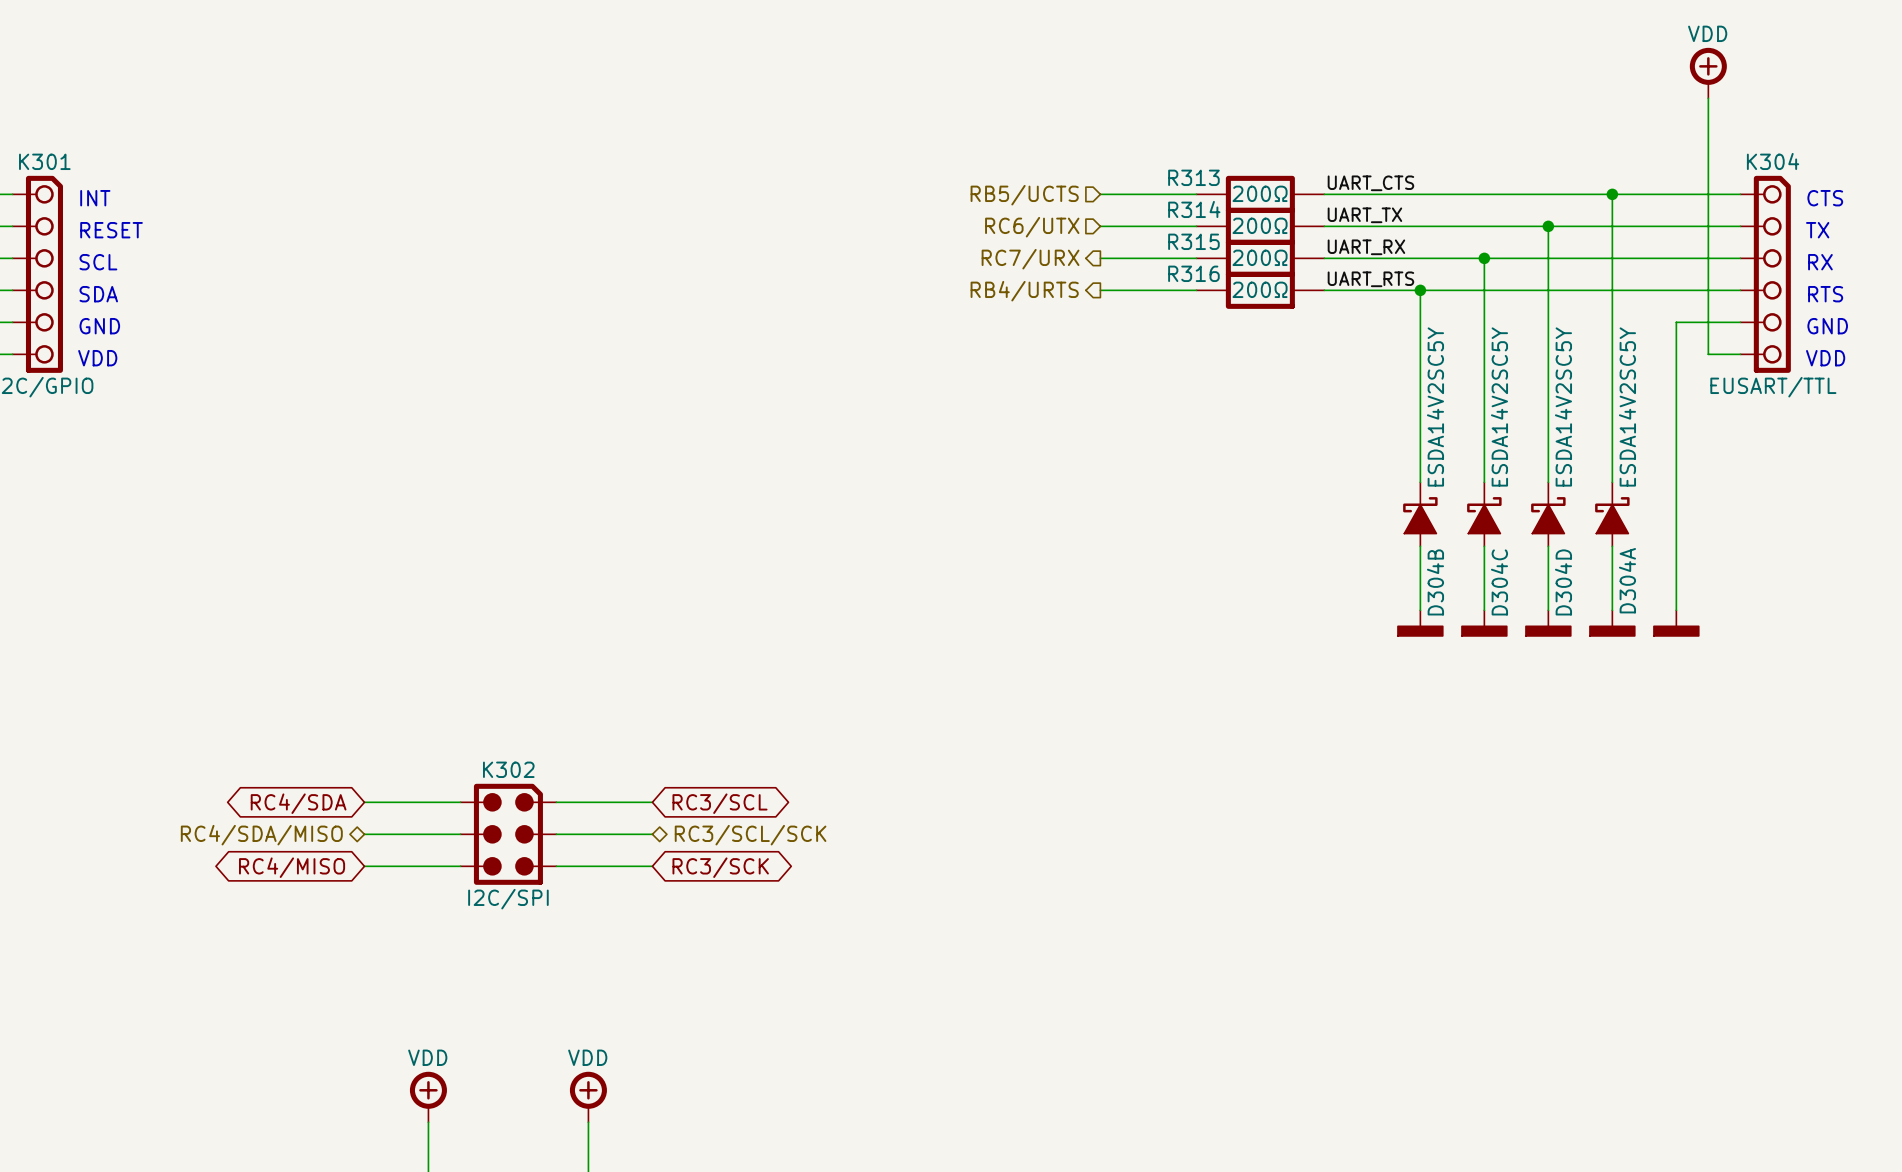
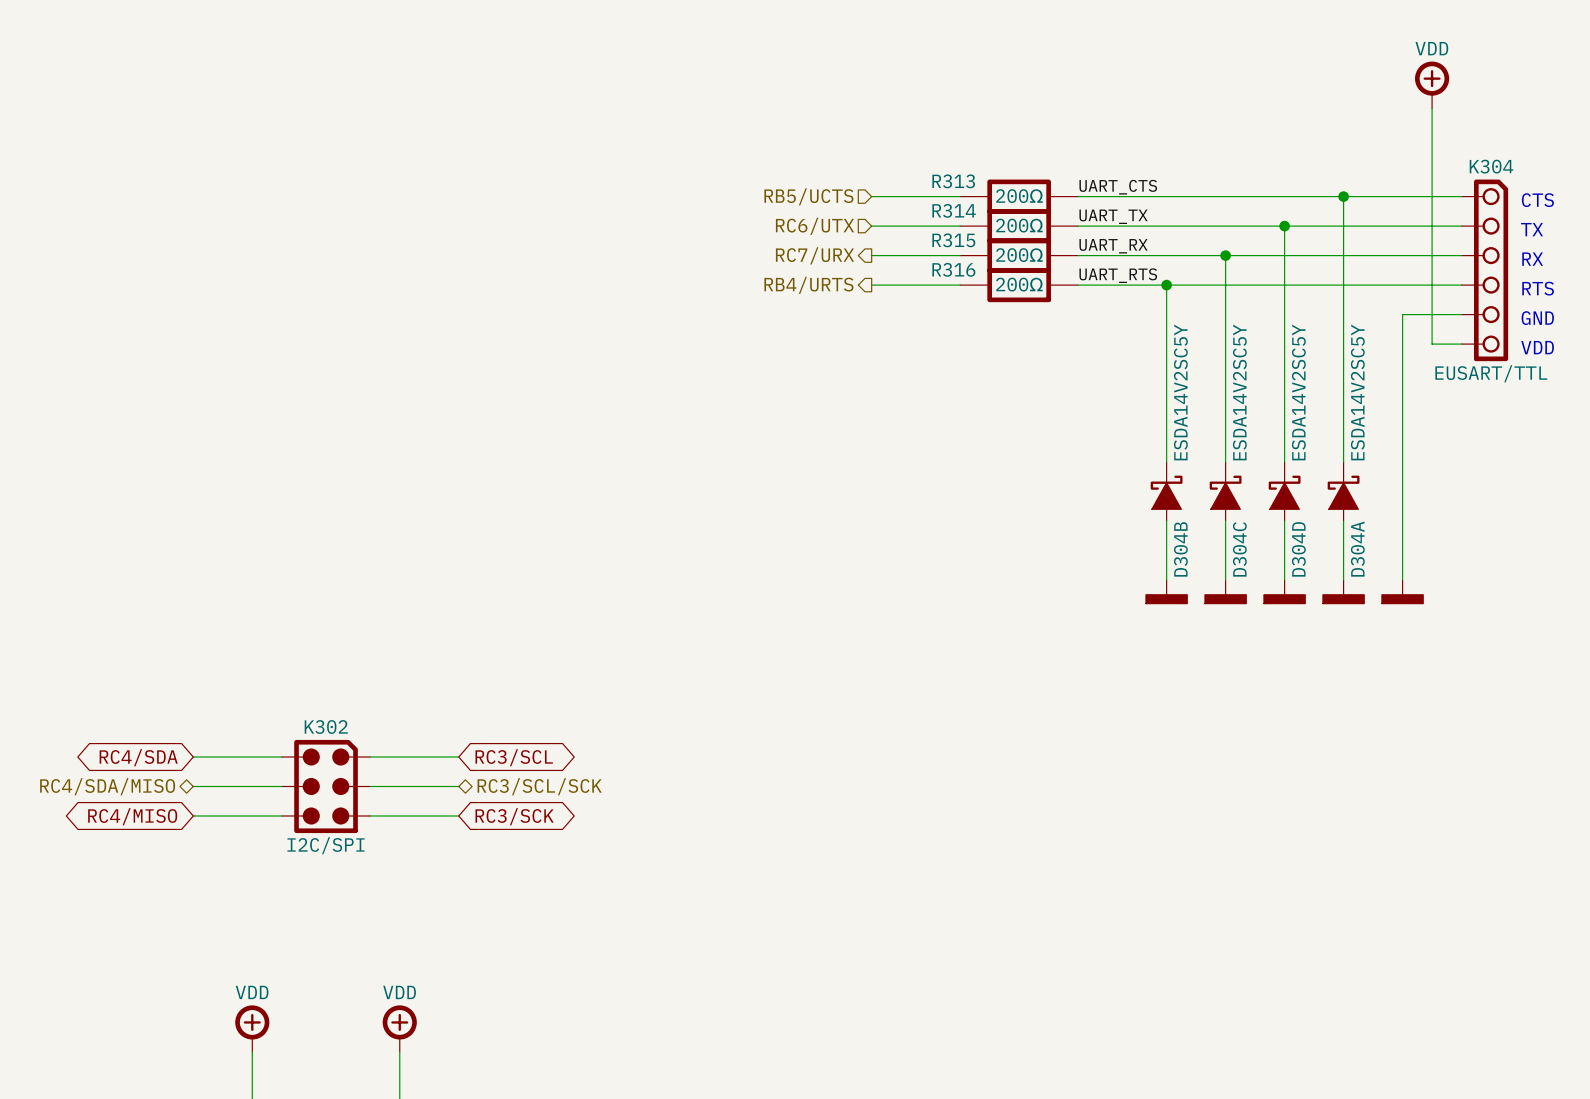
D304B text: none -> ESDA14V2SC5Y (1180, 392)
D304C text: none -> ESDA14V2SC5Y (1239, 392)
D304D text: none -> ESDA14V2SC5Y (1298, 392)
D304A text: none -> ESDA14V2SC5Y (1357, 392)
D304B value: ESDA14V2SC5Y (1435, 406) -> none
D304C value: ESDA14V2SC5Y (1499, 406) -> none
D304D value: ESDA14V2SC5Y (1563, 406) -> none
D304A value: ESDA14V2SC5Y (1627, 406) -> none

